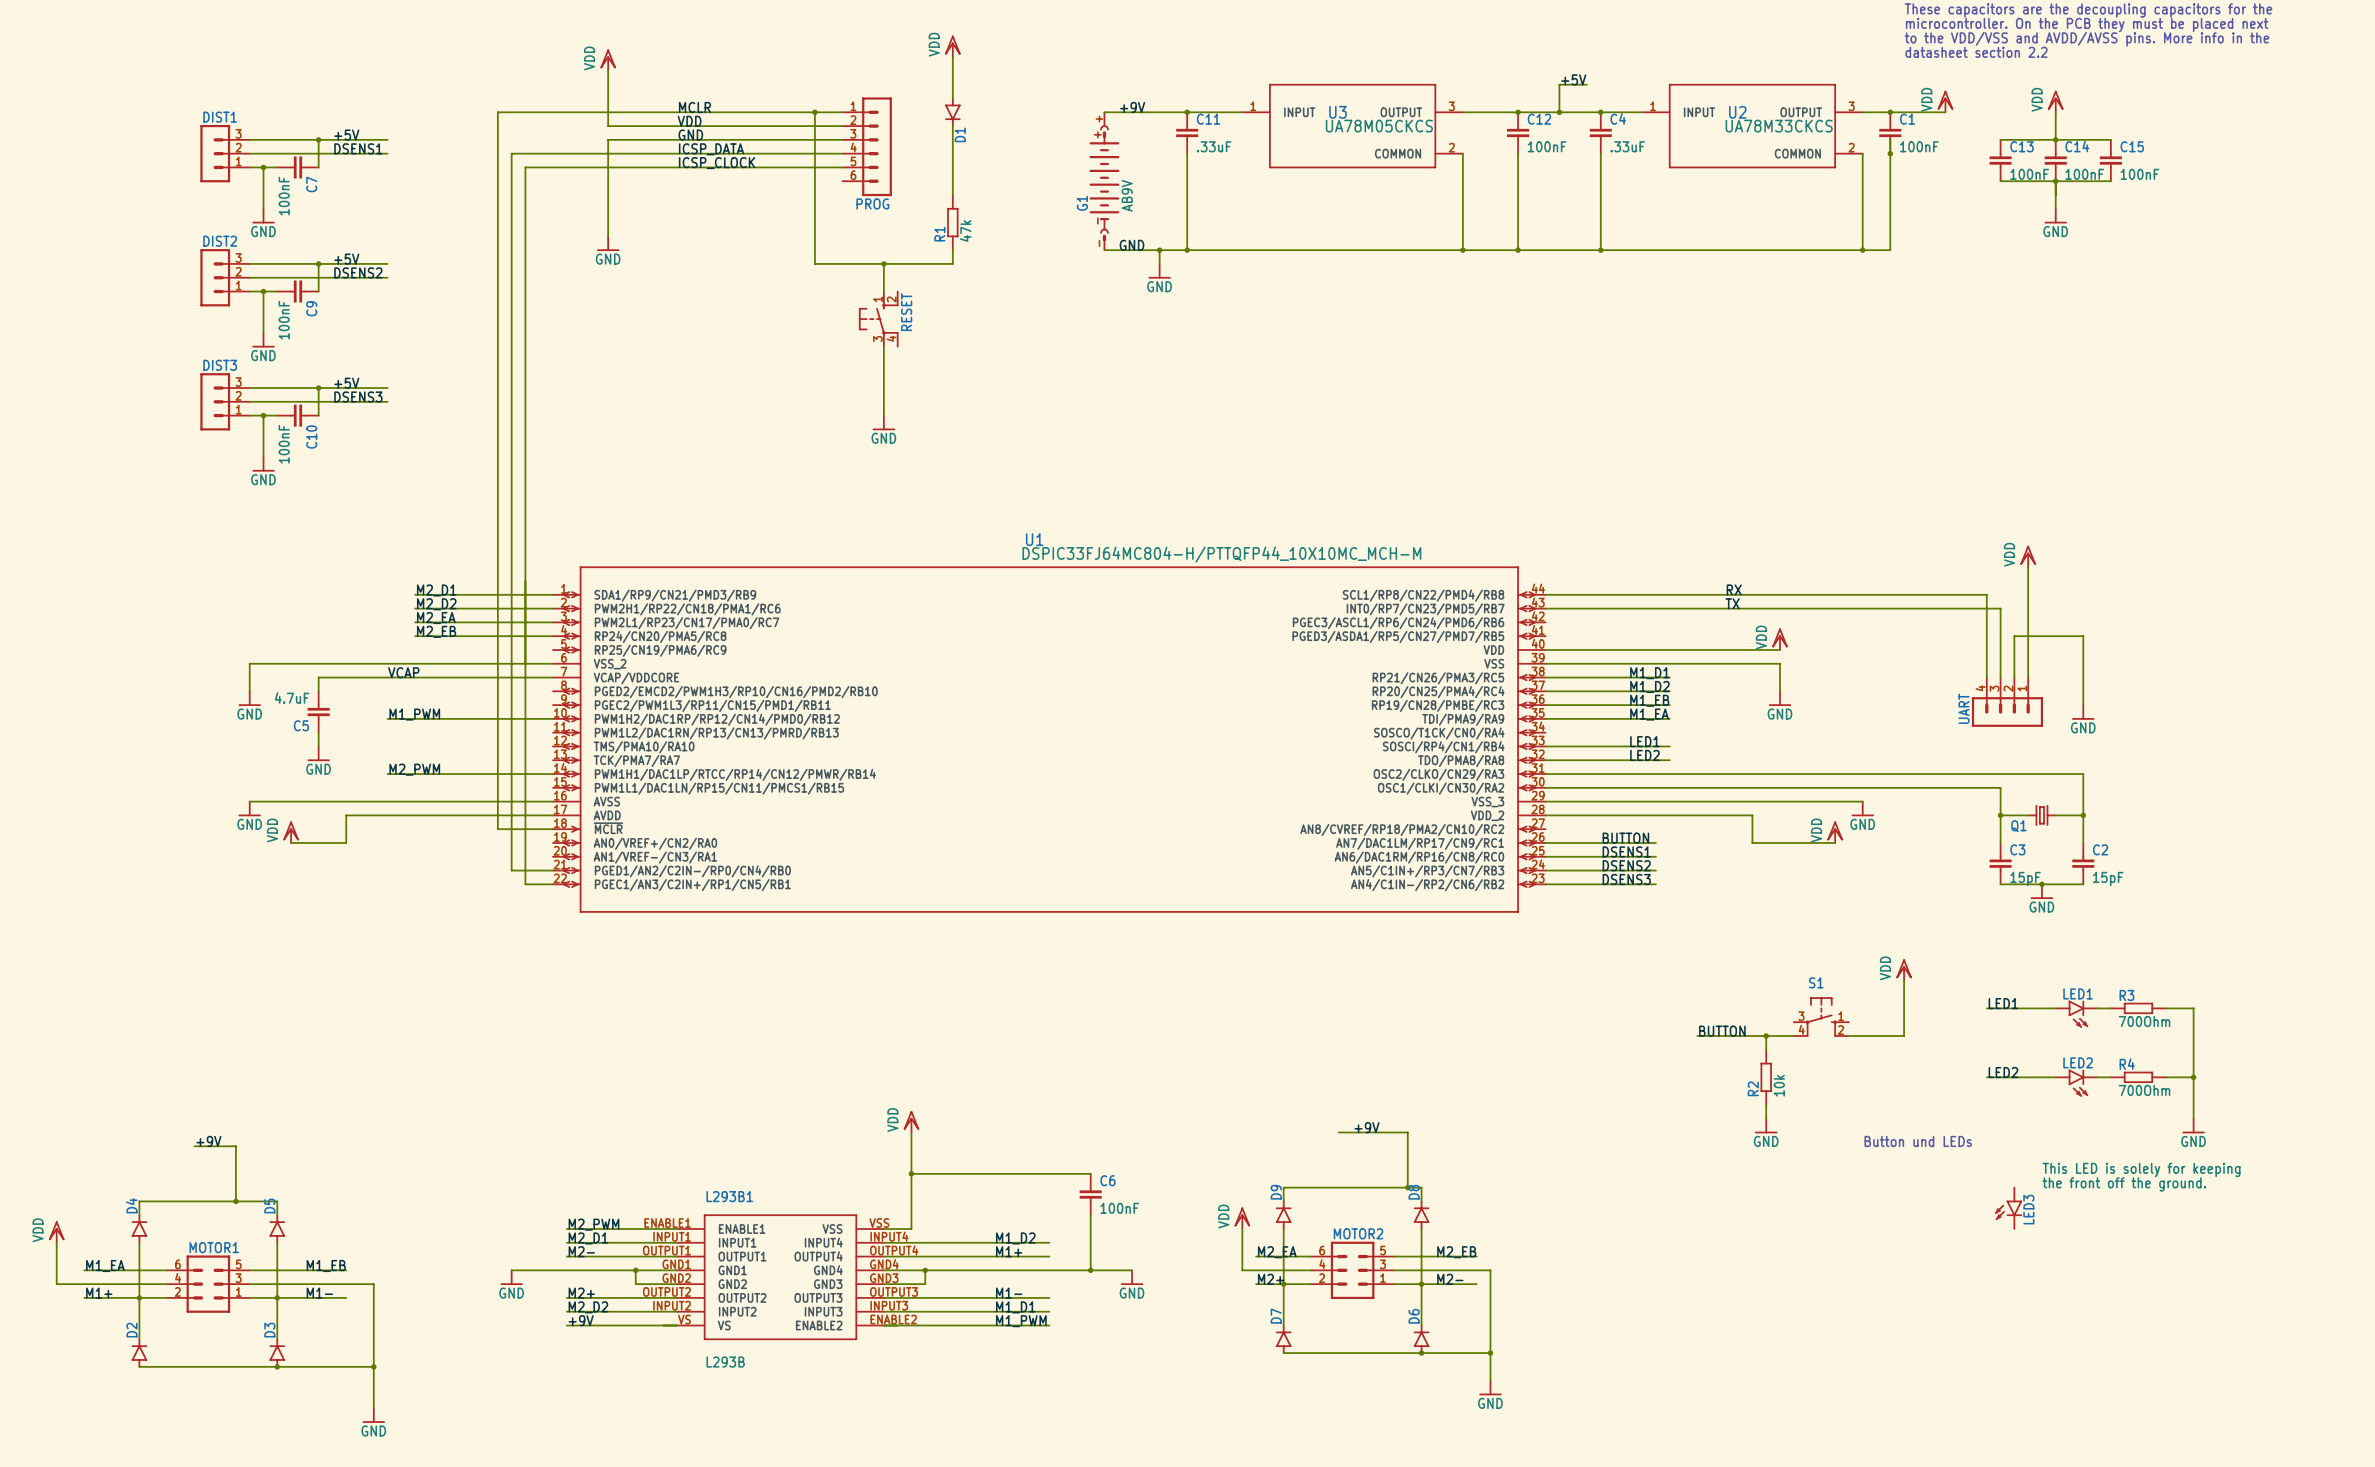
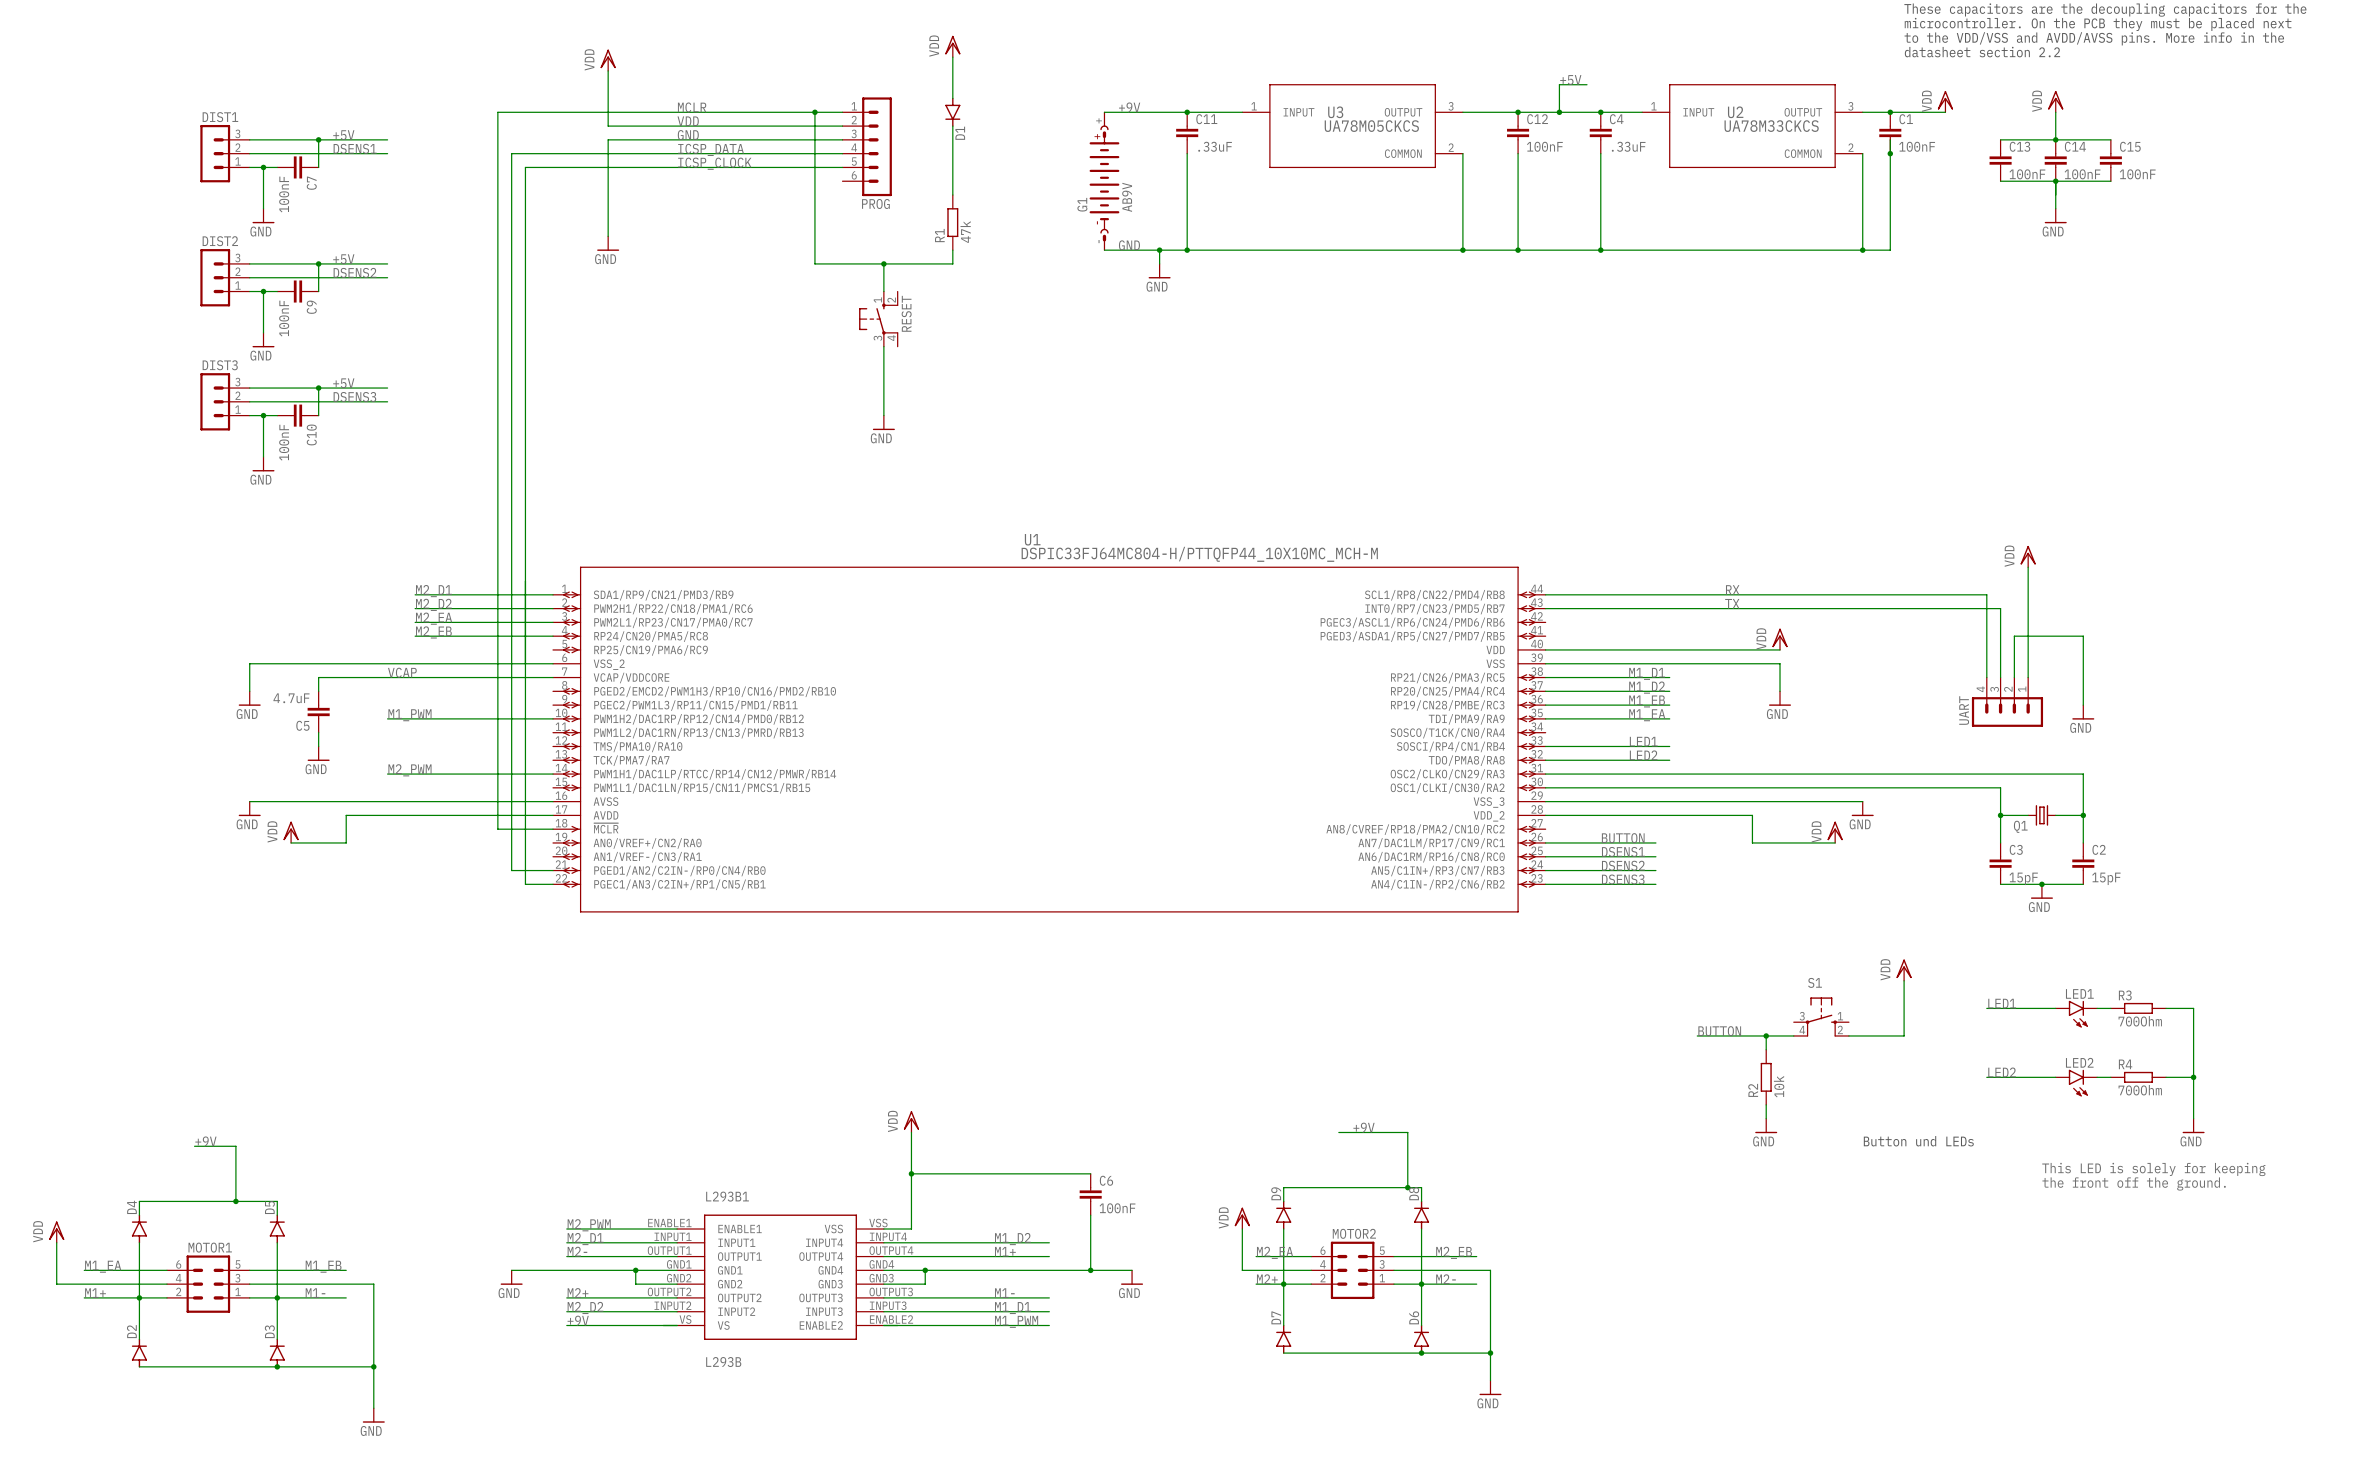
LED3: (2008, 1208) -> none

